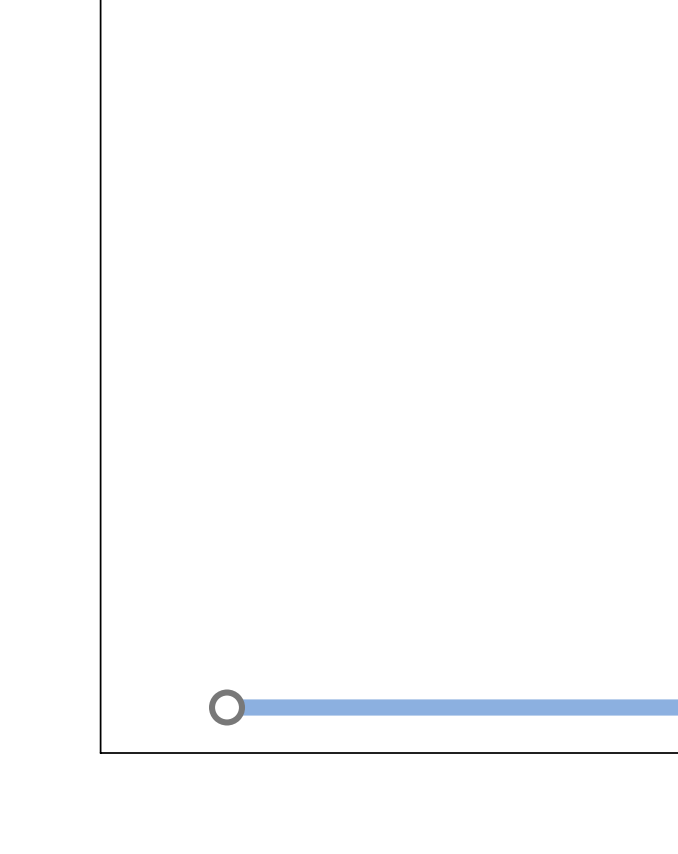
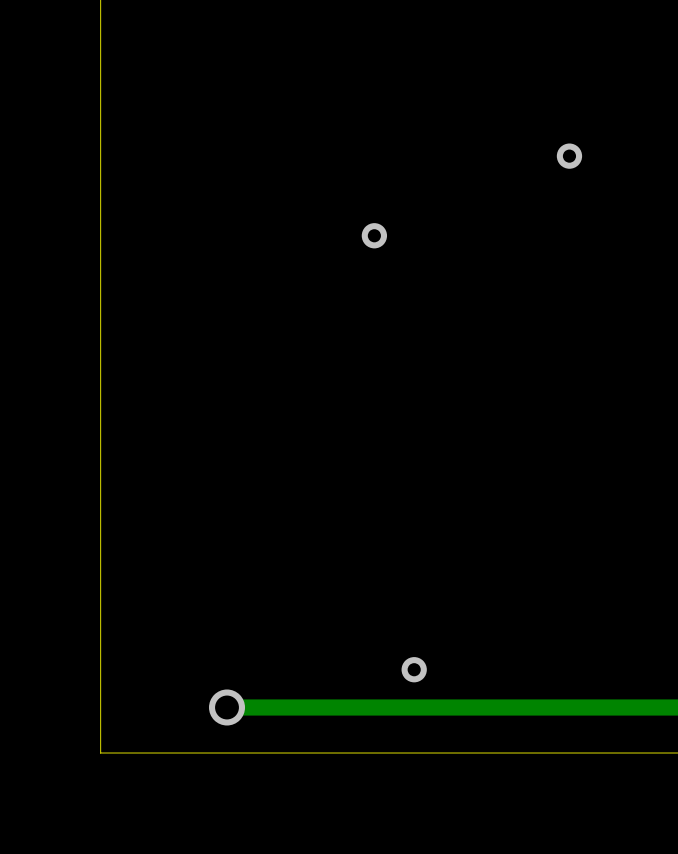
via: none -> (569, 156)
via: none -> (374, 235)
via: none -> (414, 669)

